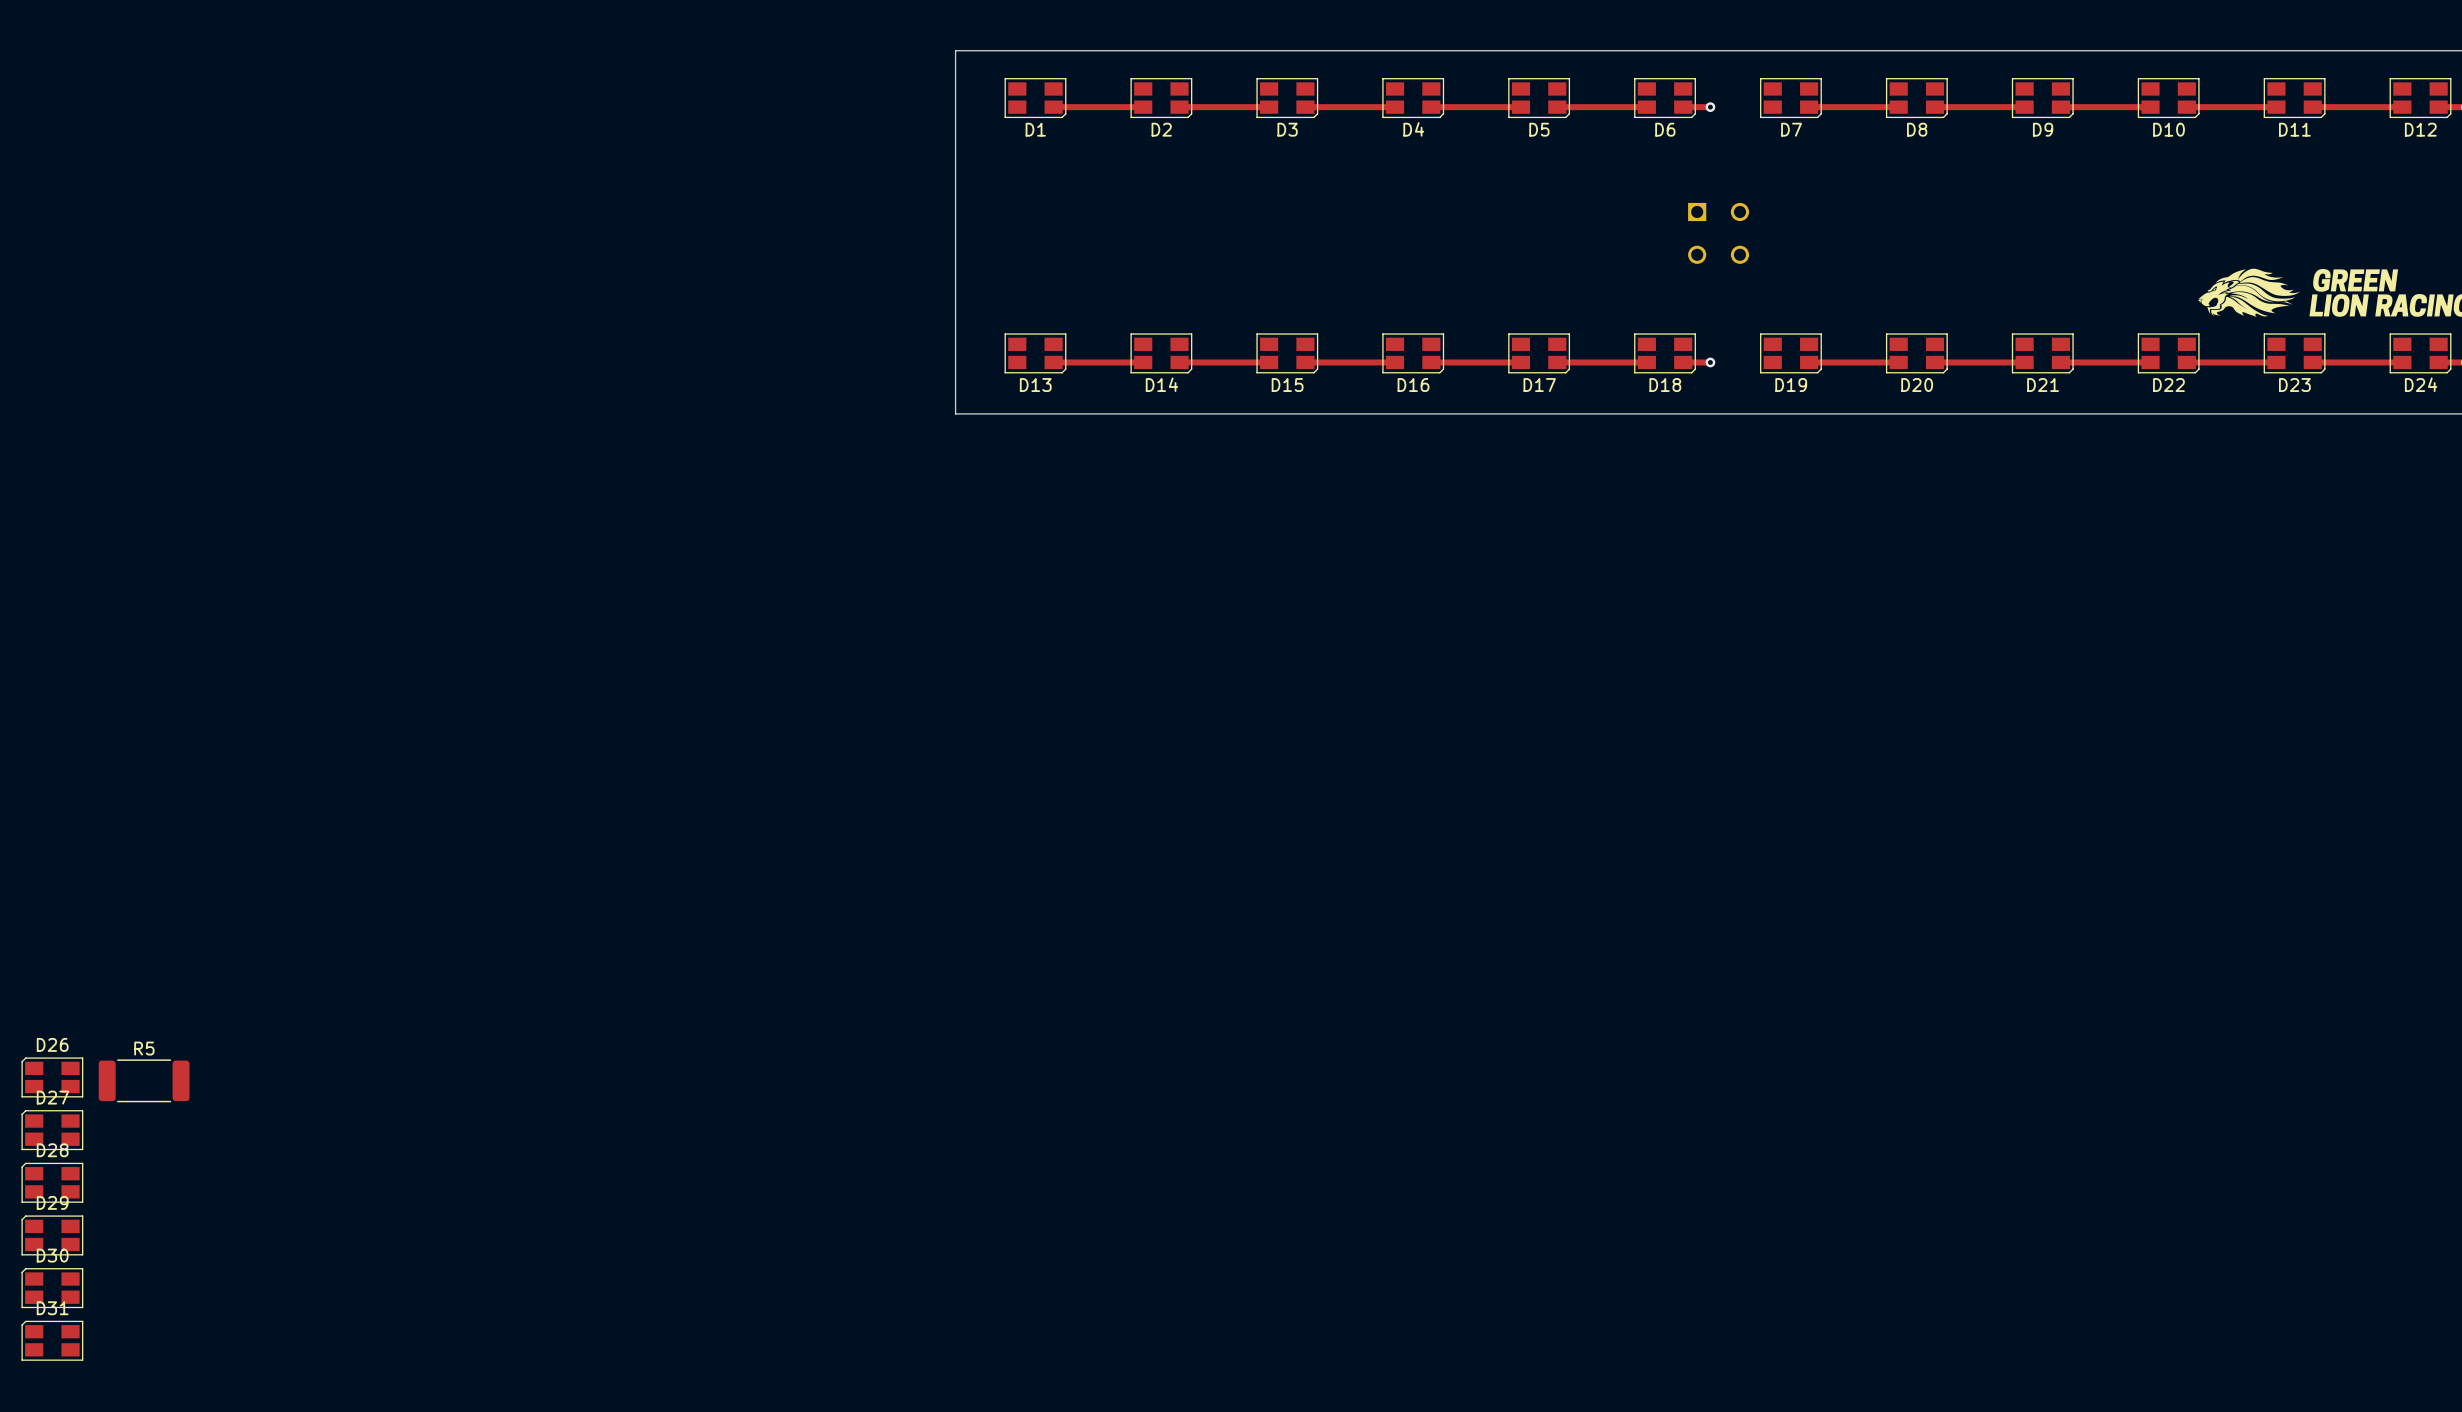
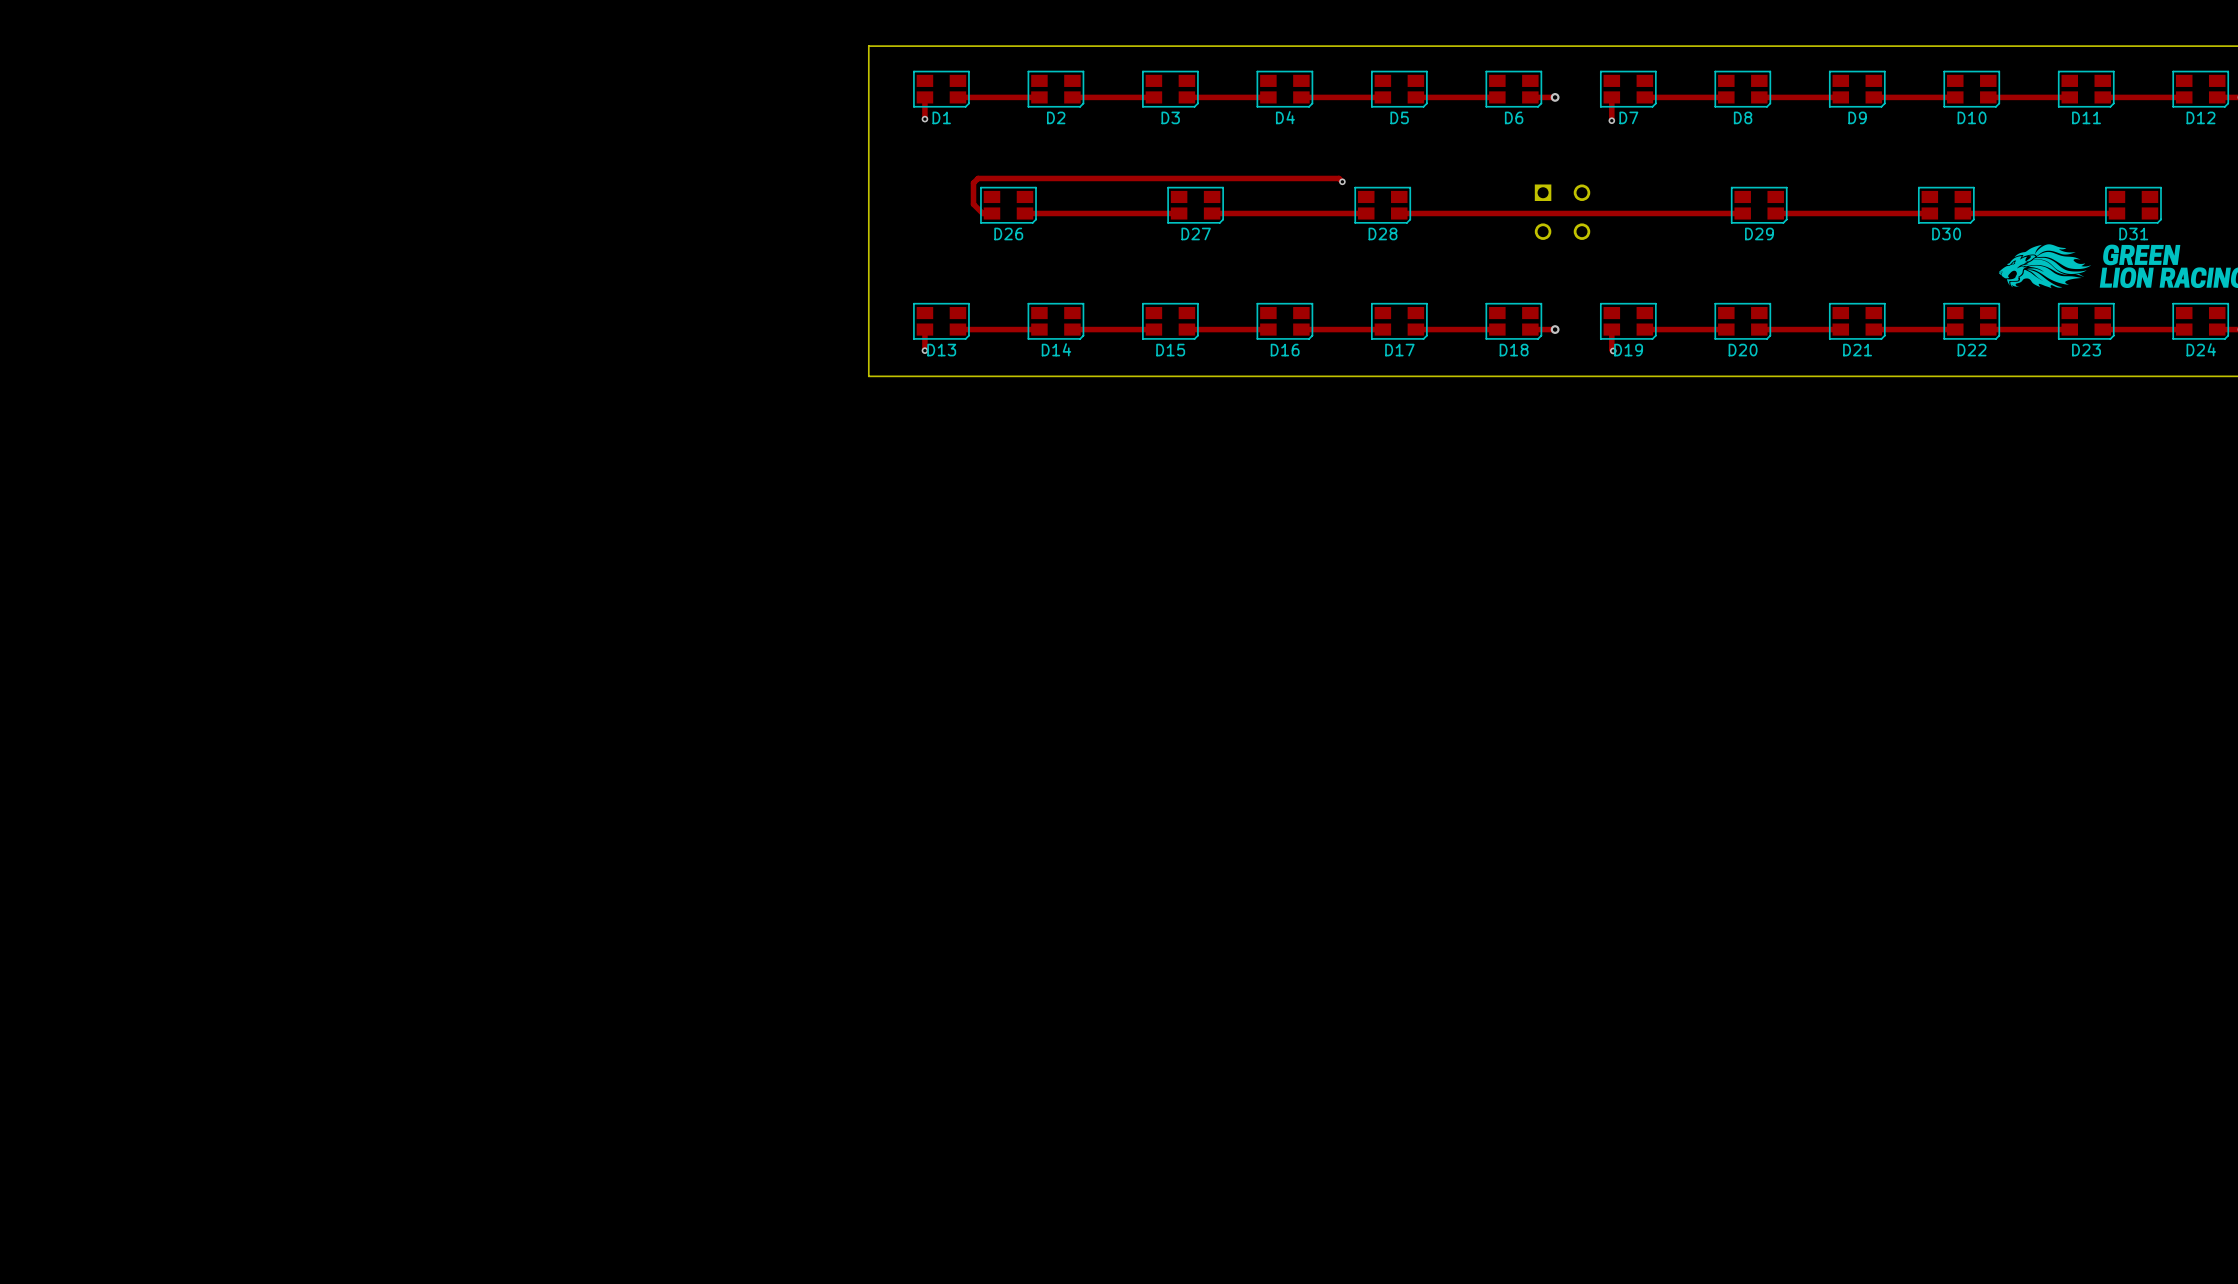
track: none -> (924, 97) (924, 119)
track: none -> (1611, 97) (1611, 120)
via: none -> (924, 119)
via: none -> (1611, 120)
track: none -> (1342, 181) (1339, 178) (978, 178) (973, 182) (973, 204) (982, 213) (991, 213)
via: none -> (1342, 181)
track: none -> (1025, 213) (1179, 213)
track: none -> (1212, 213) (1366, 213)
track: none -> (1399, 213) (1742, 213)
track: none -> (1775, 213) (1929, 213)
track: none -> (1962, 213) (2116, 213)
track: none -> (924, 329) (924, 350)
track: none -> (1611, 329) (1613, 350)
via: none -> (924, 350)
via: none -> (1613, 350)
D26 rotation: 0° (52, 1077) -> 180° (1008, 205)
D26 position: (52, 1077) -> (1008, 205)
R5: (144, 1080) -> none
D27 rotation: 0° (52, 1130) -> 180° (1195, 205)
D27 position: (52, 1130) -> (1195, 205)
D28 rotation: 0° (52, 1182) -> 180° (1382, 205)
D28 position: (52, 1182) -> (1382, 205)
D29 rotation: 0° (52, 1235) -> 180° (1759, 205)
D29 position: (52, 1235) -> (1759, 205)
D30 rotation: 0° (52, 1288) -> 180° (1946, 205)
D30 position: (52, 1288) -> (1946, 205)
D31 rotation: 0° (52, 1340) -> 180° (2133, 205)
D31 position: (52, 1340) -> (2133, 205)

